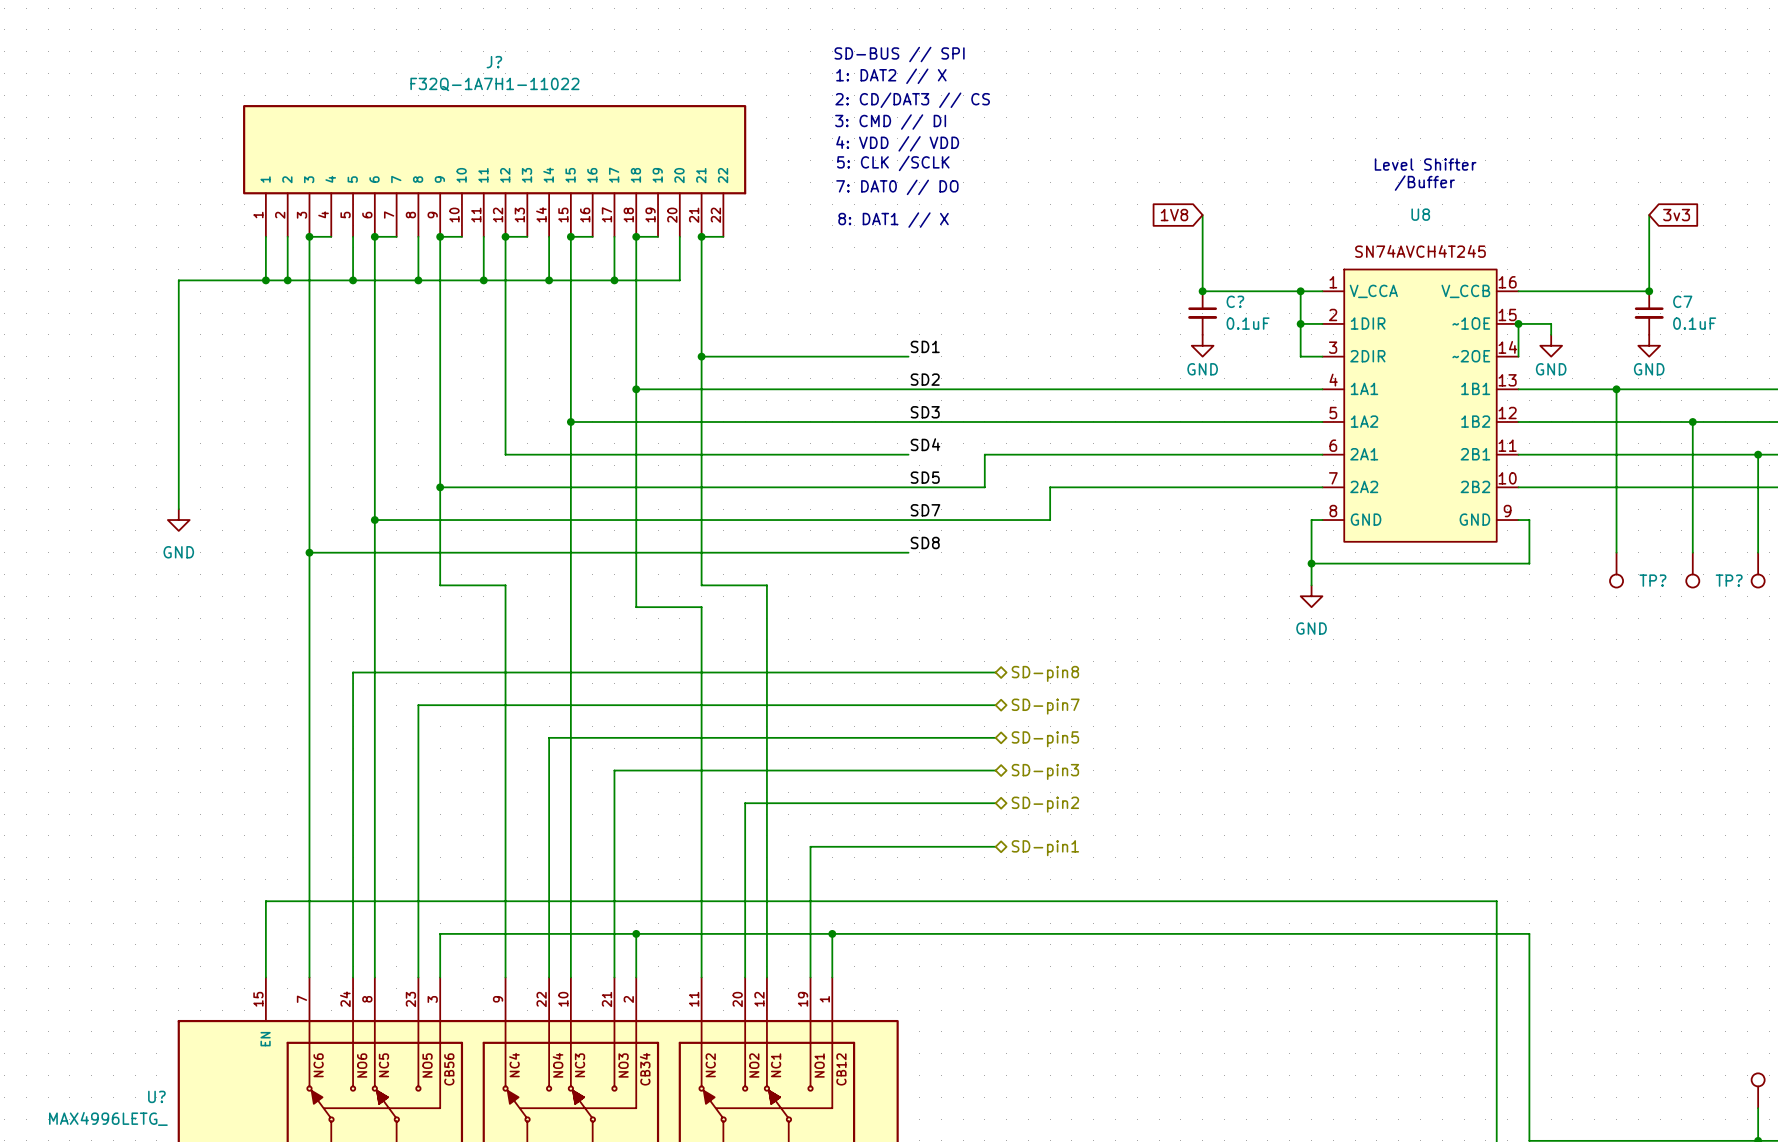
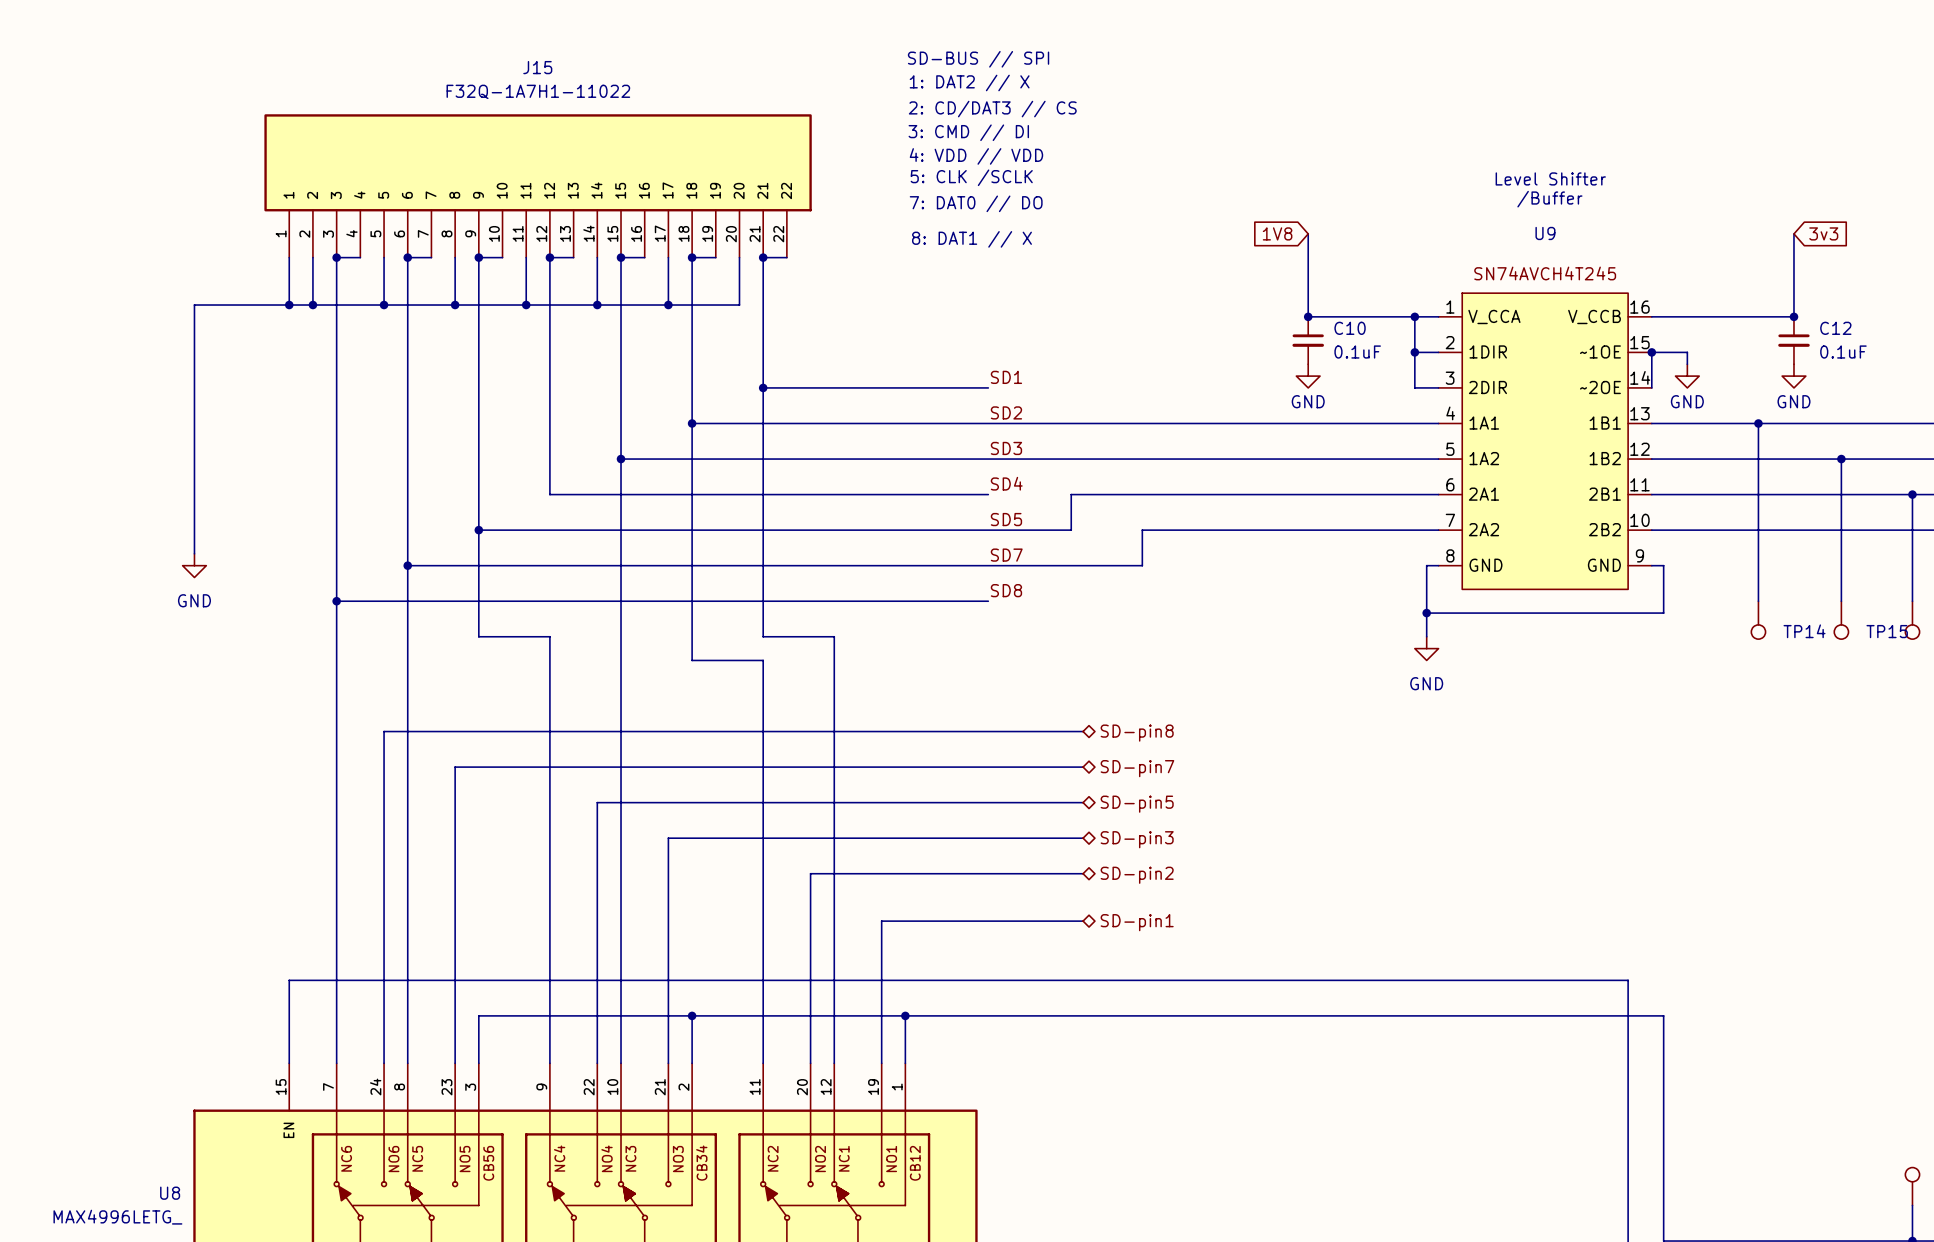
J? name: J? (494, 62) -> J15 (537, 67)
U8 name: U8 (1420, 214) -> U9 (1545, 233)
C? name: C? (1235, 301) -> C10 (1350, 328)
C7 name: C7 (1682, 301) -> C12 (1835, 328)
TP? name: TP? (1652, 580) -> TP14 (1804, 631)
TP? name: TP? (1729, 580) -> TP15 (1887, 631)
U? name: U? (156, 1096) -> U8 (170, 1193)

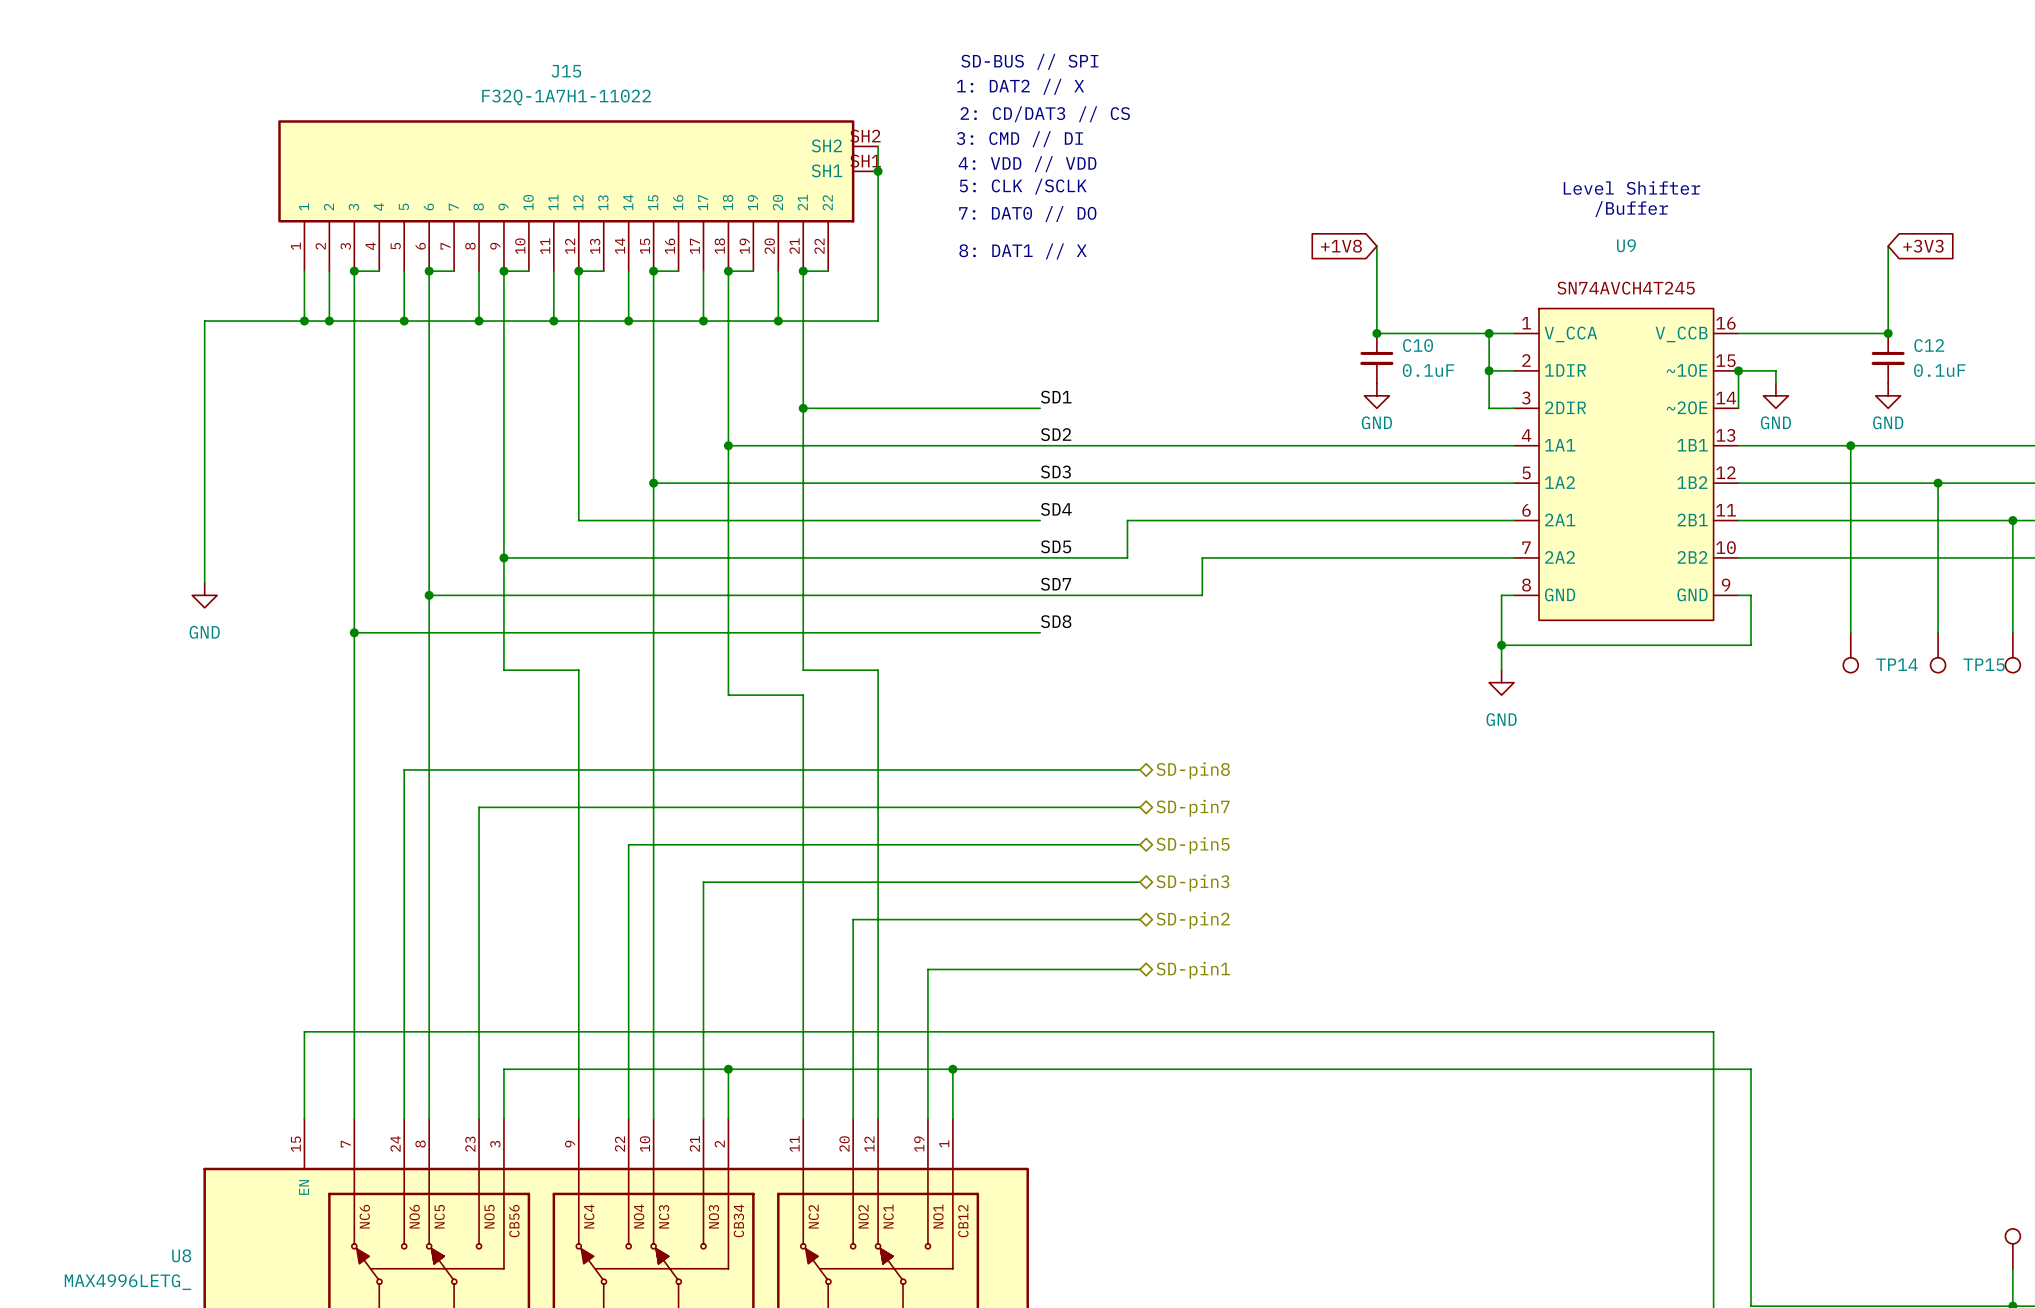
J15 symbol: [264, 114, 812, 258] -> [278, 120, 879, 272]
wire: none -> (878, 146) (878, 321) (778, 321)
junction: none -> (878, 171)
global label: 1V8 (1277, 233) -> +1V8 (1341, 246)
global label: 3v3 (1823, 233) -> +3V3 (1923, 246)
junction: none -> (778, 321)

